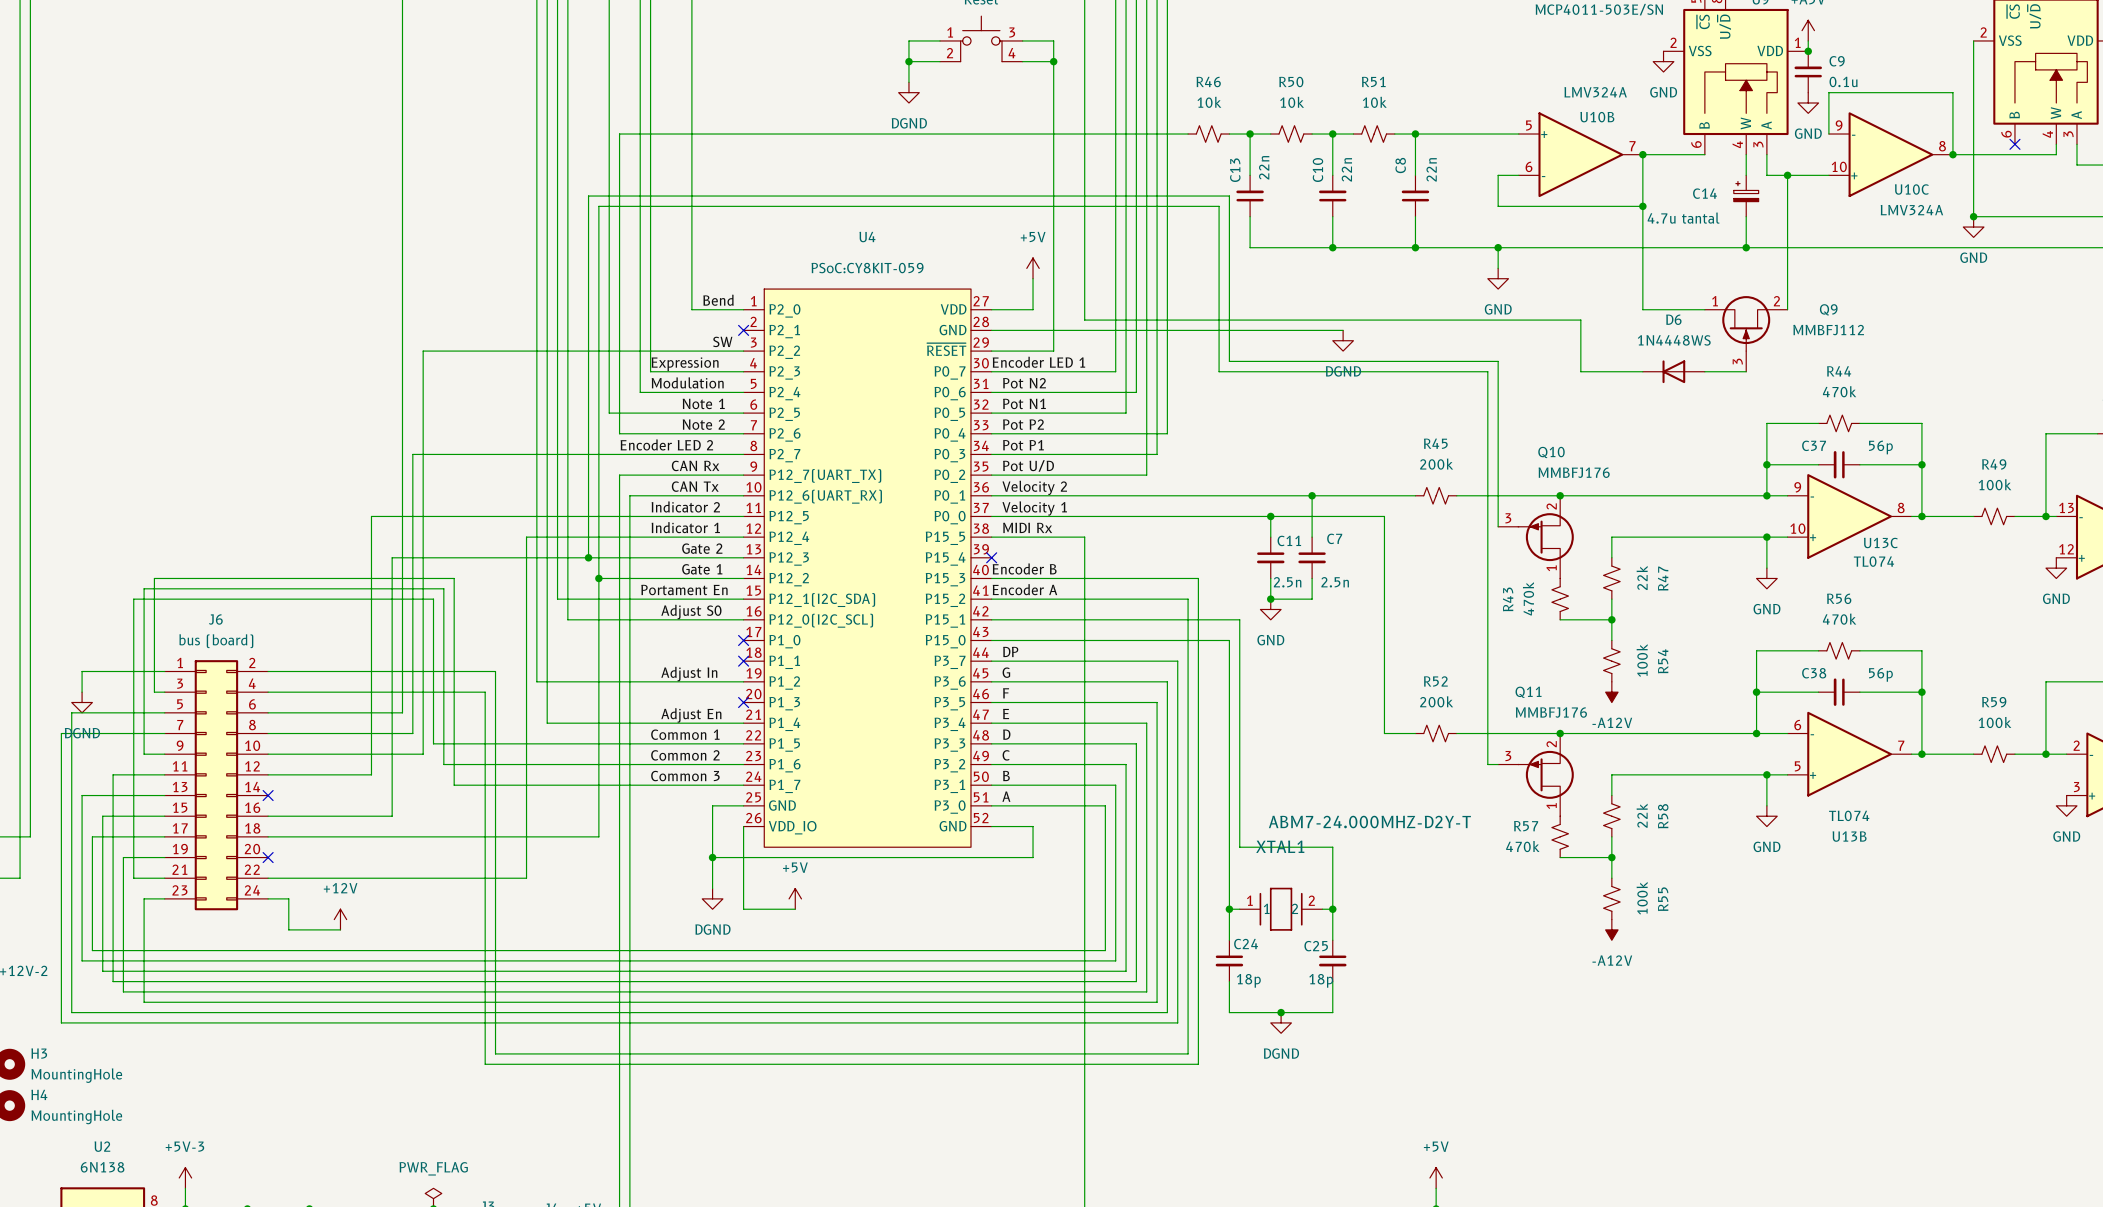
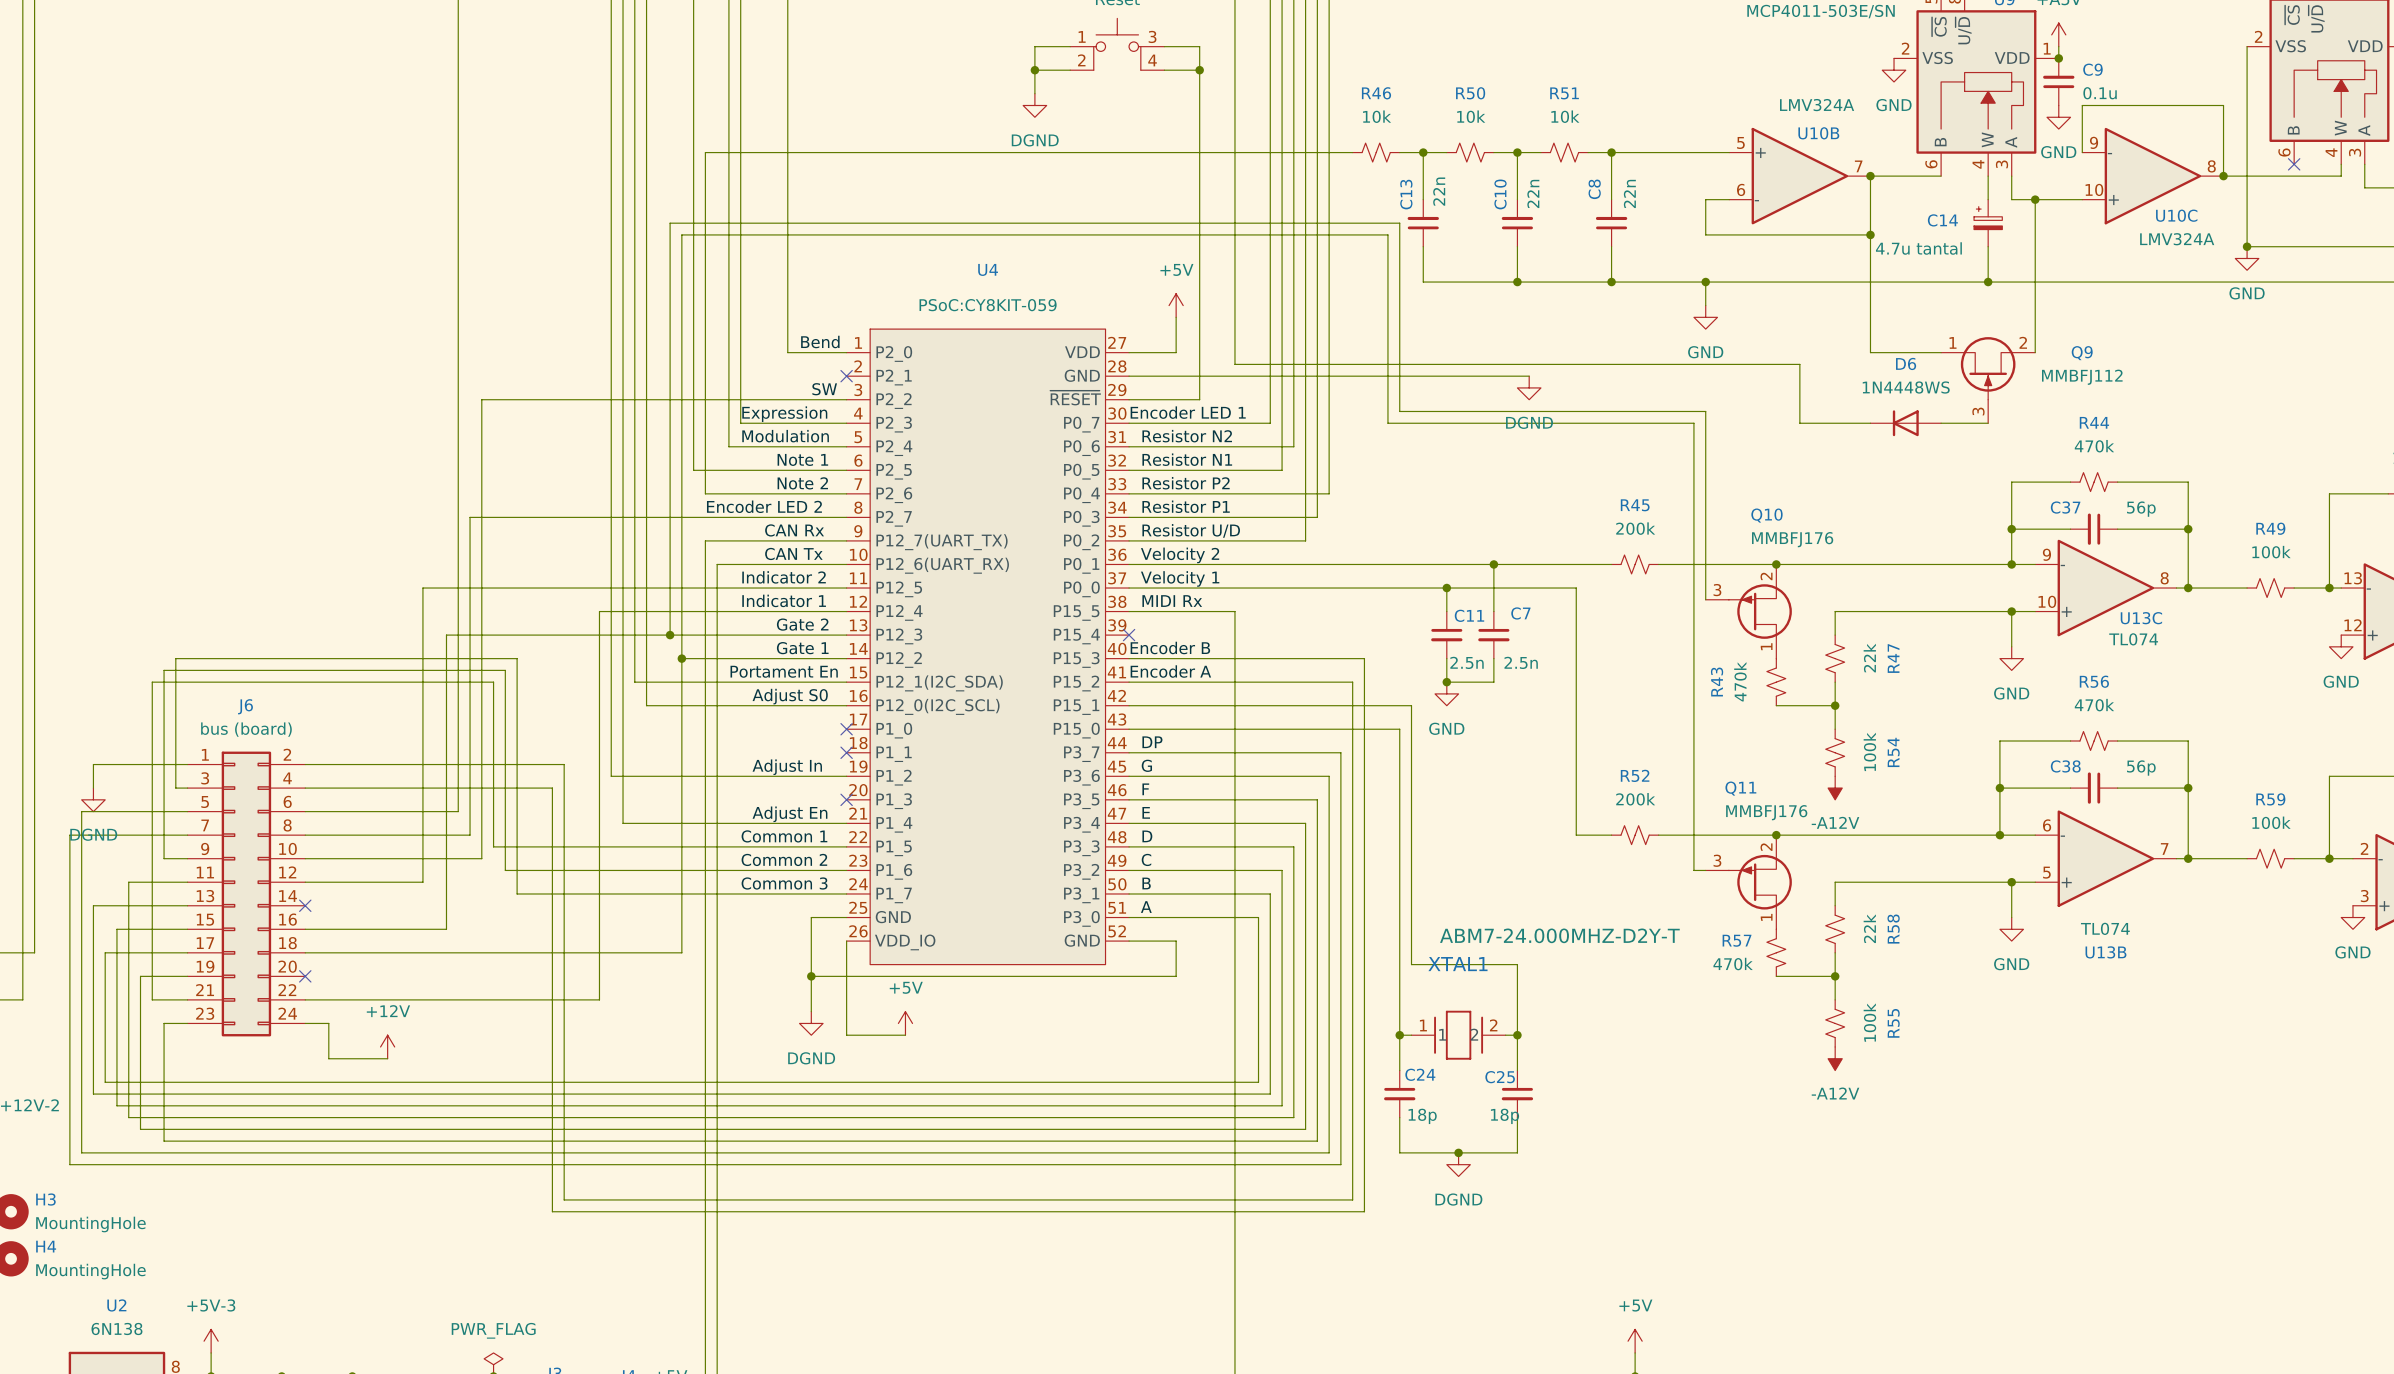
label: Pot N2 (1024, 383) -> Resistor N2 (1187, 436)
label: Pot N1 (1024, 403) -> Resistor N1 (1187, 459)
label: Pot P2 (1023, 424) -> Resistor P2 (1186, 483)
label: Pot P1 (1023, 445) -> Resistor P1 (1186, 506)
label: Pot U/D (1028, 465) -> Resistor U/D (1191, 530)

